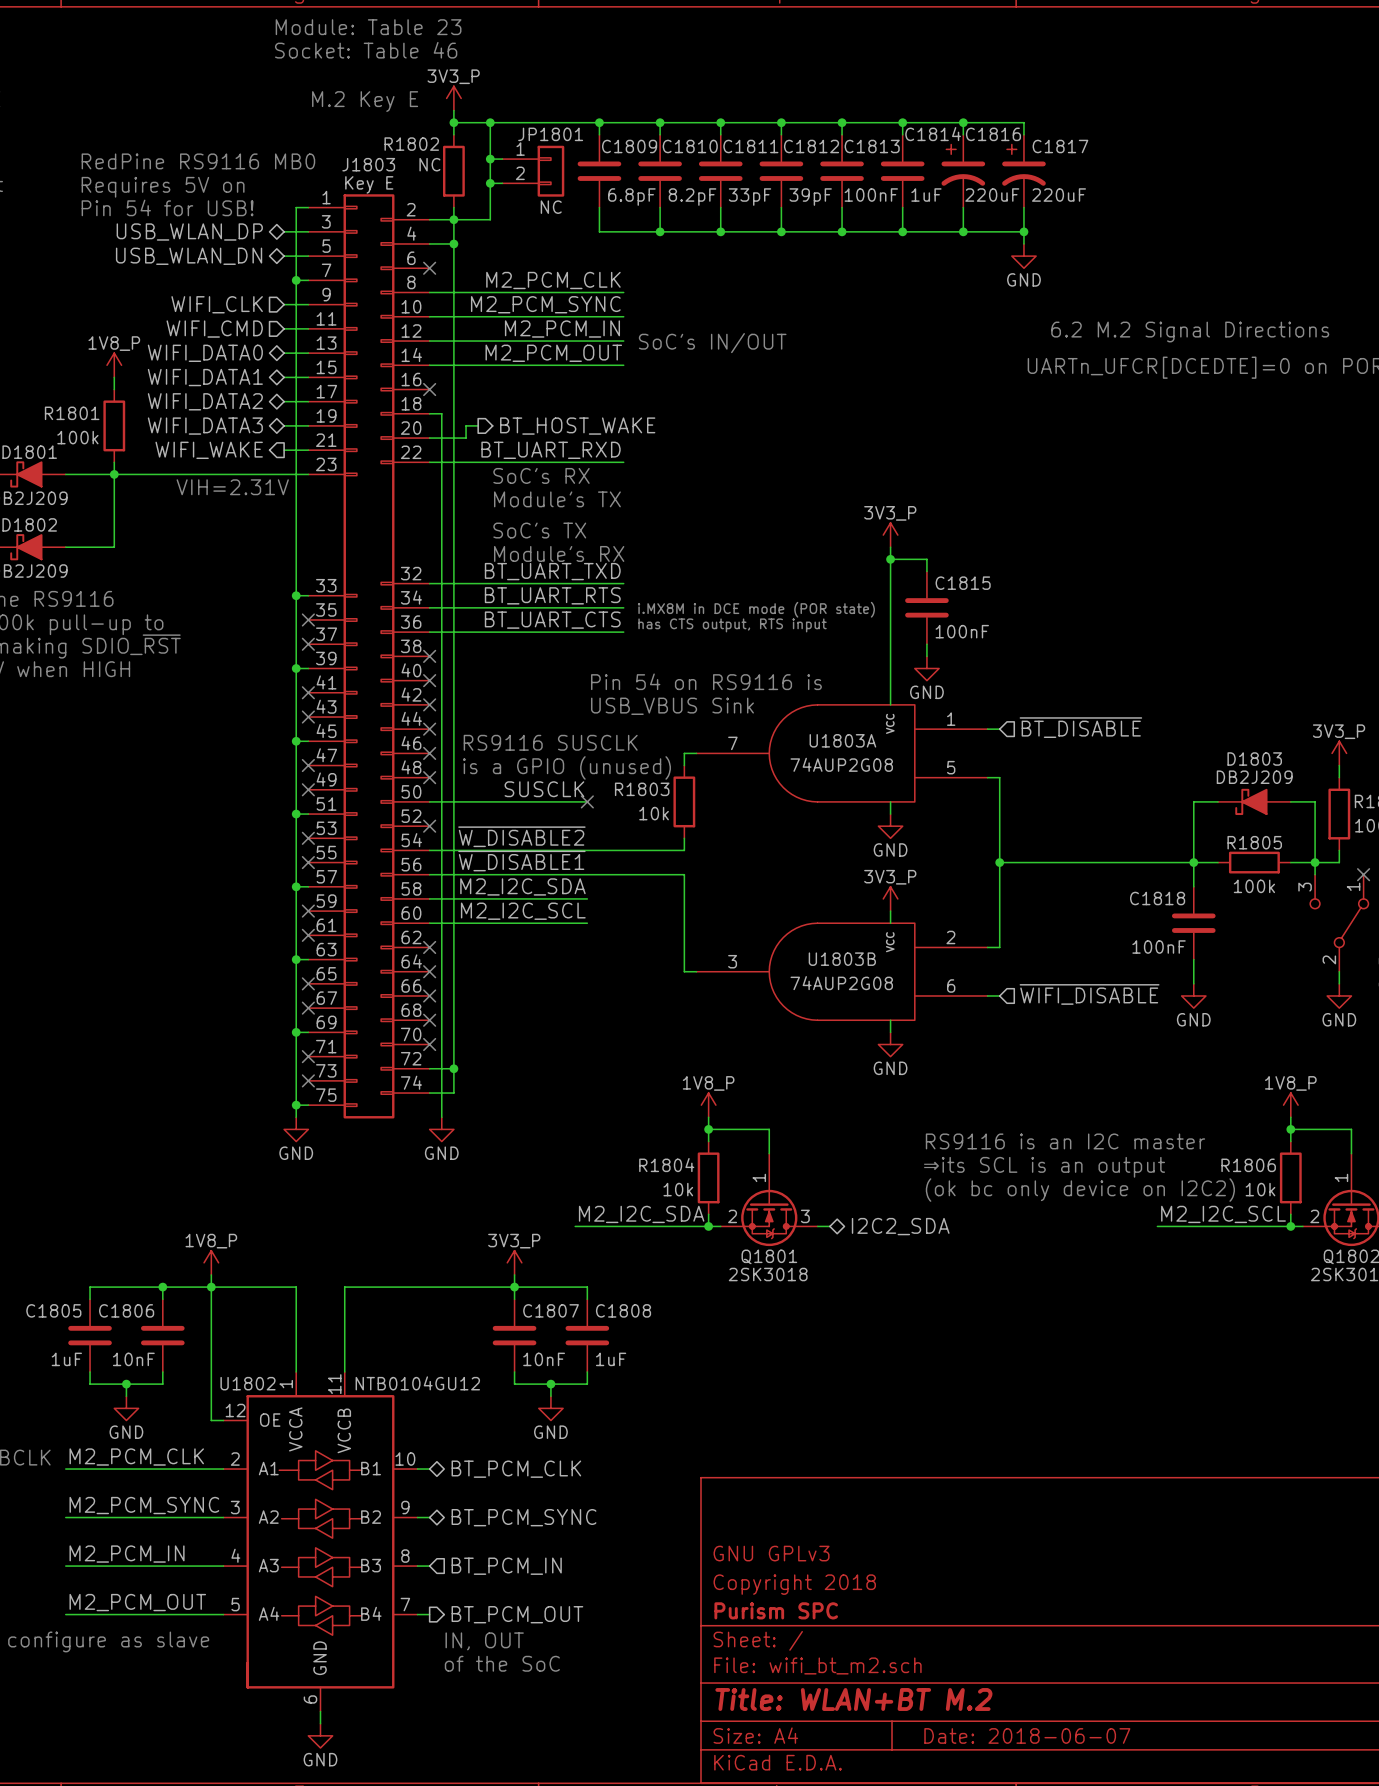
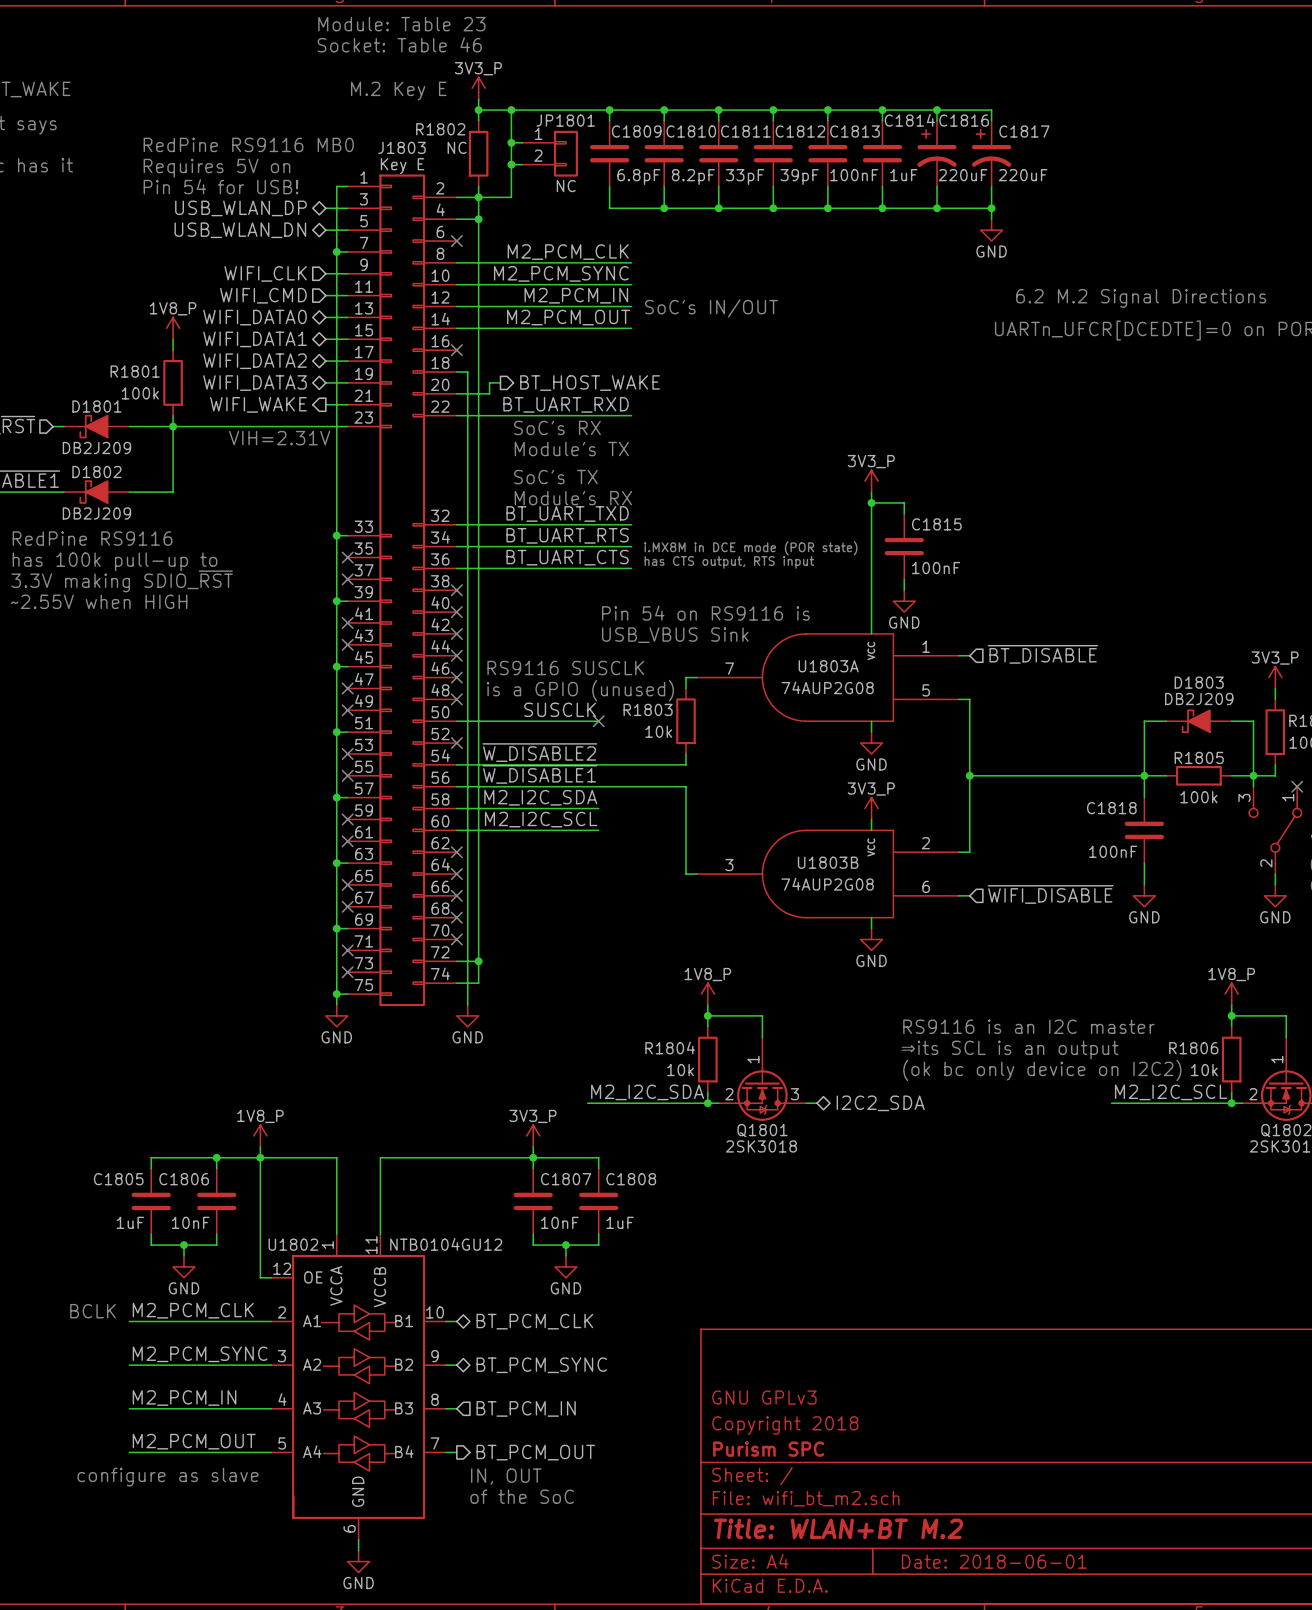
title block: Date: 2018-06-07 (1027, 1735) -> Date: 2018-06-01 (994, 1561)

